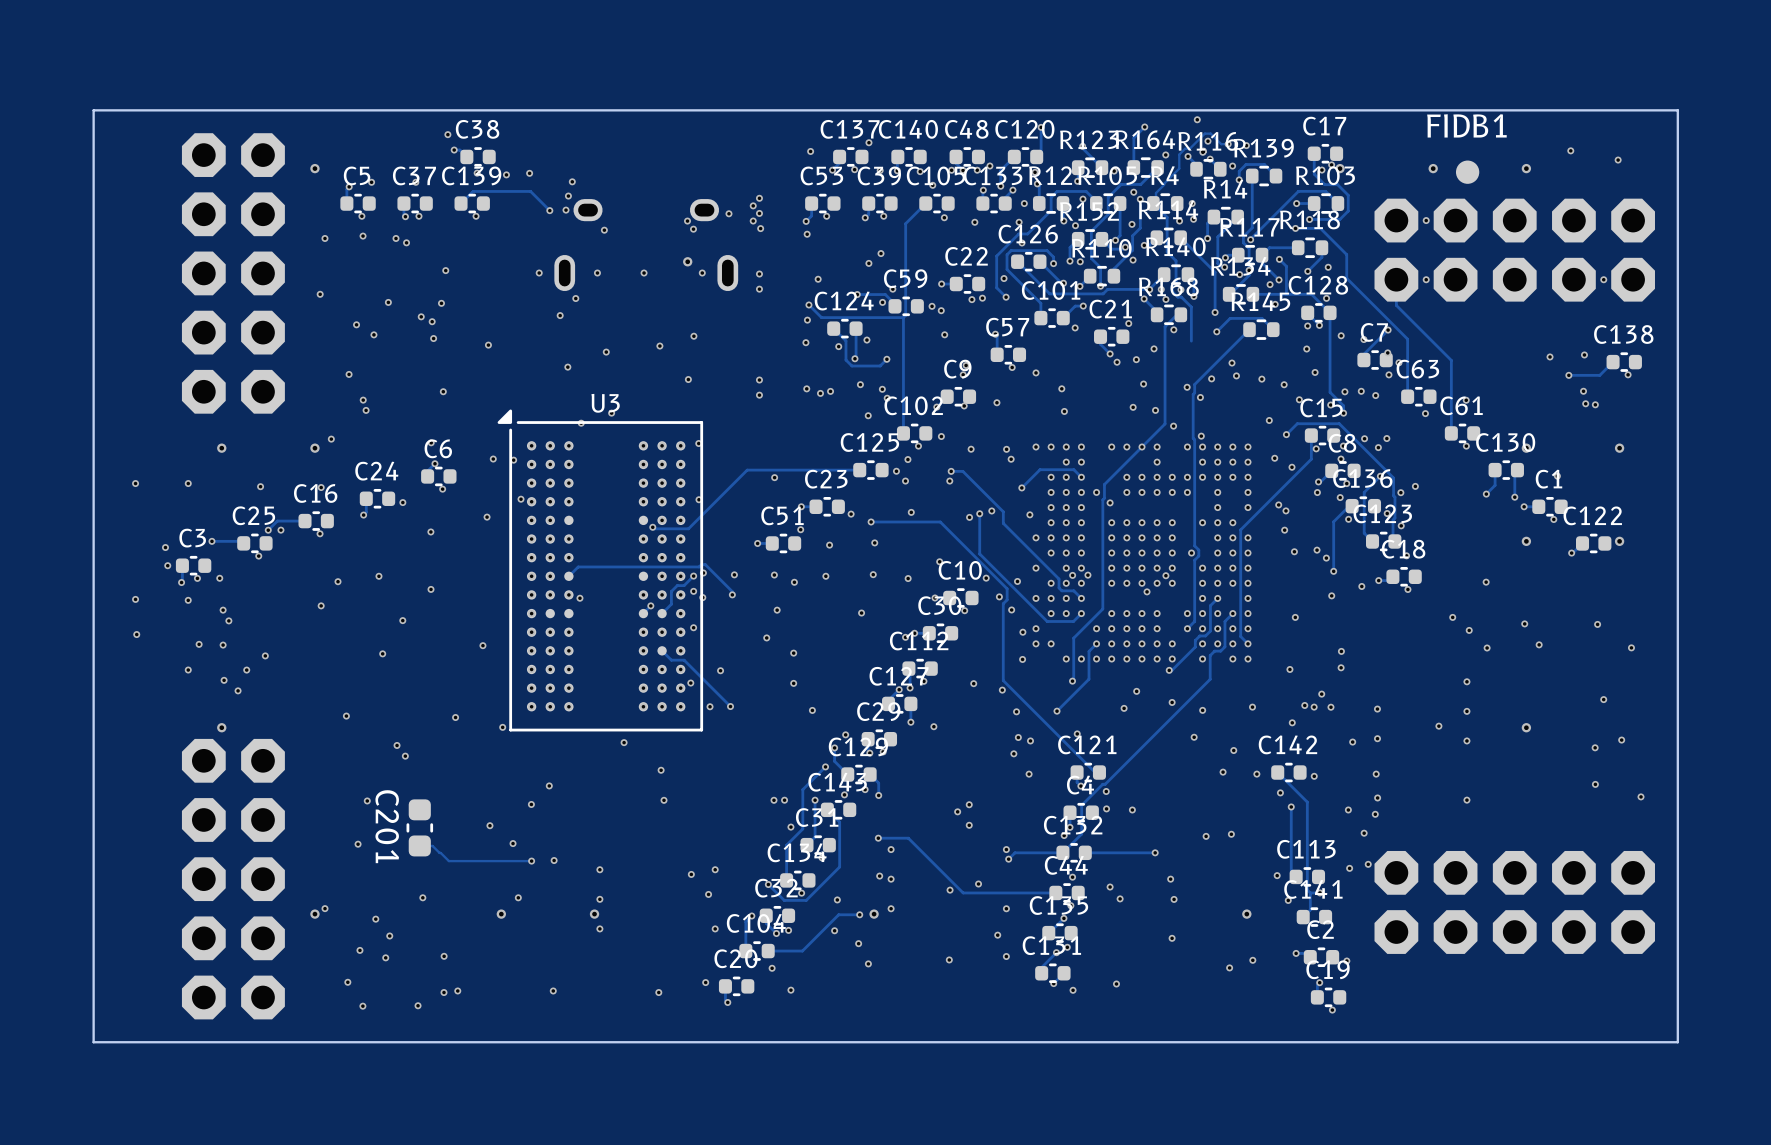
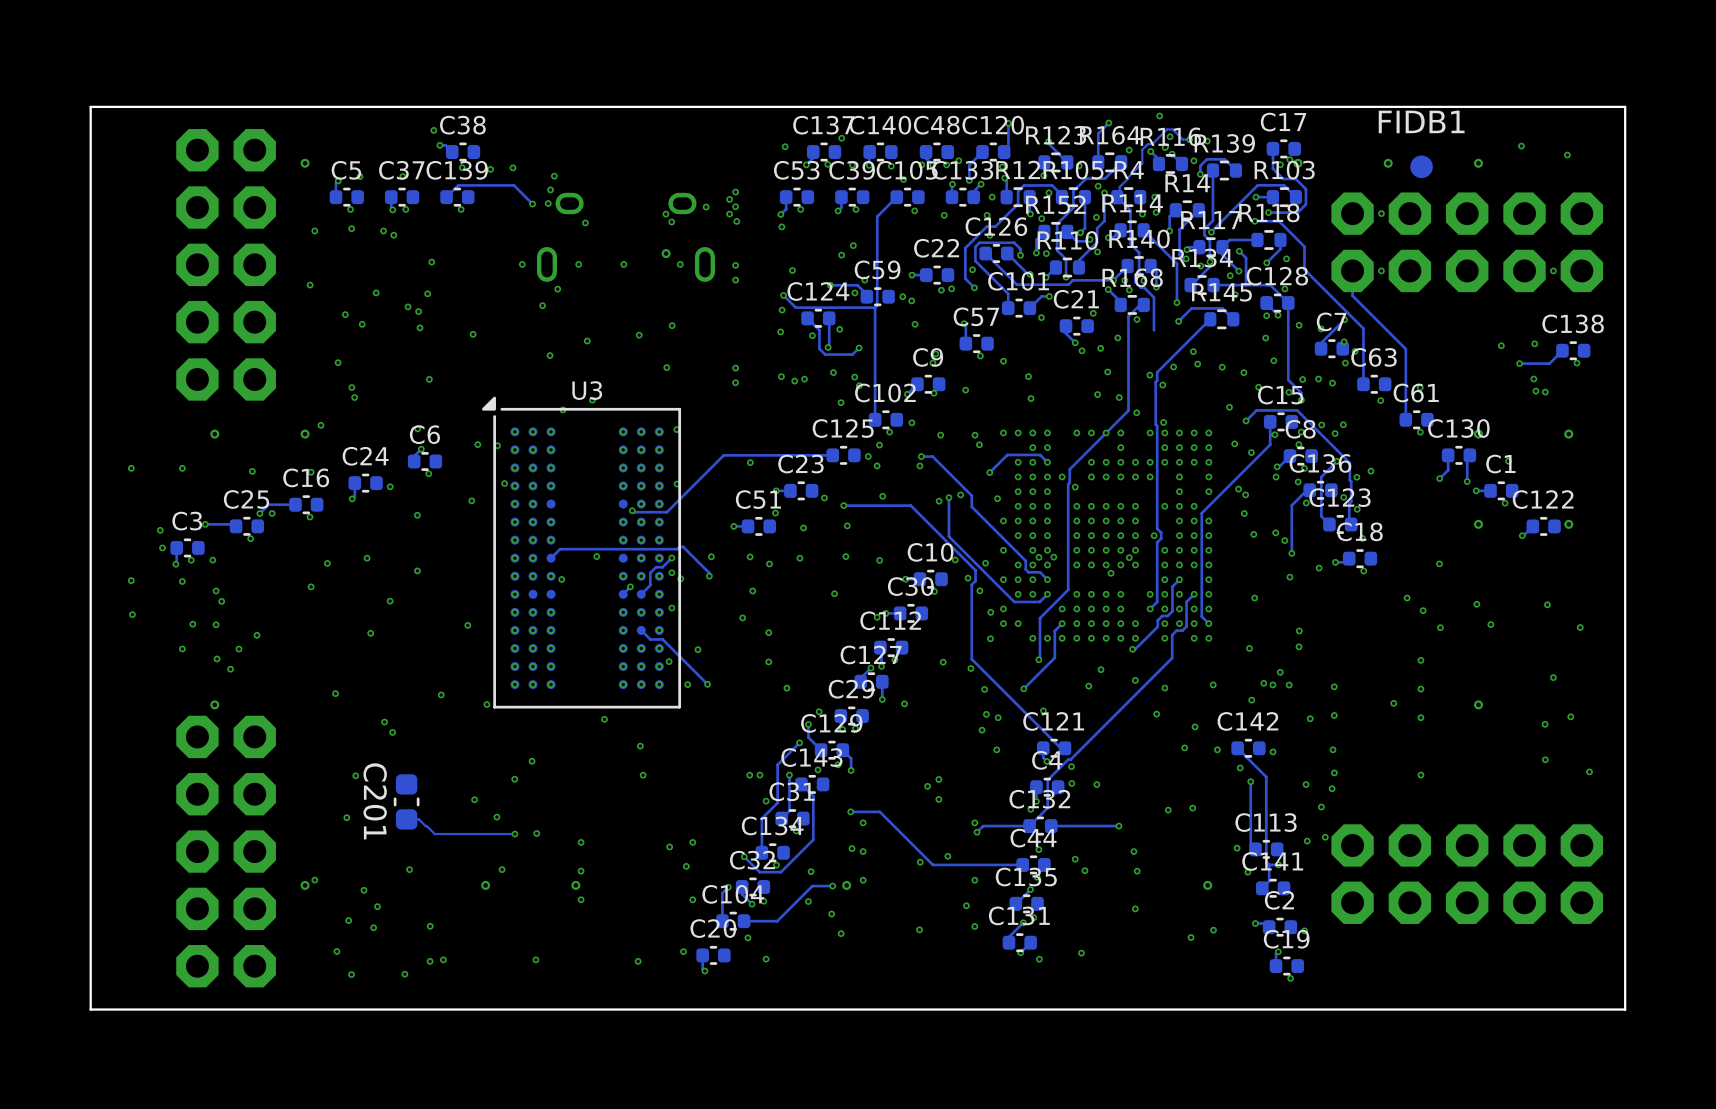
via: (939, 561) -> none
via position: (703, 572) -> (596, 556)

